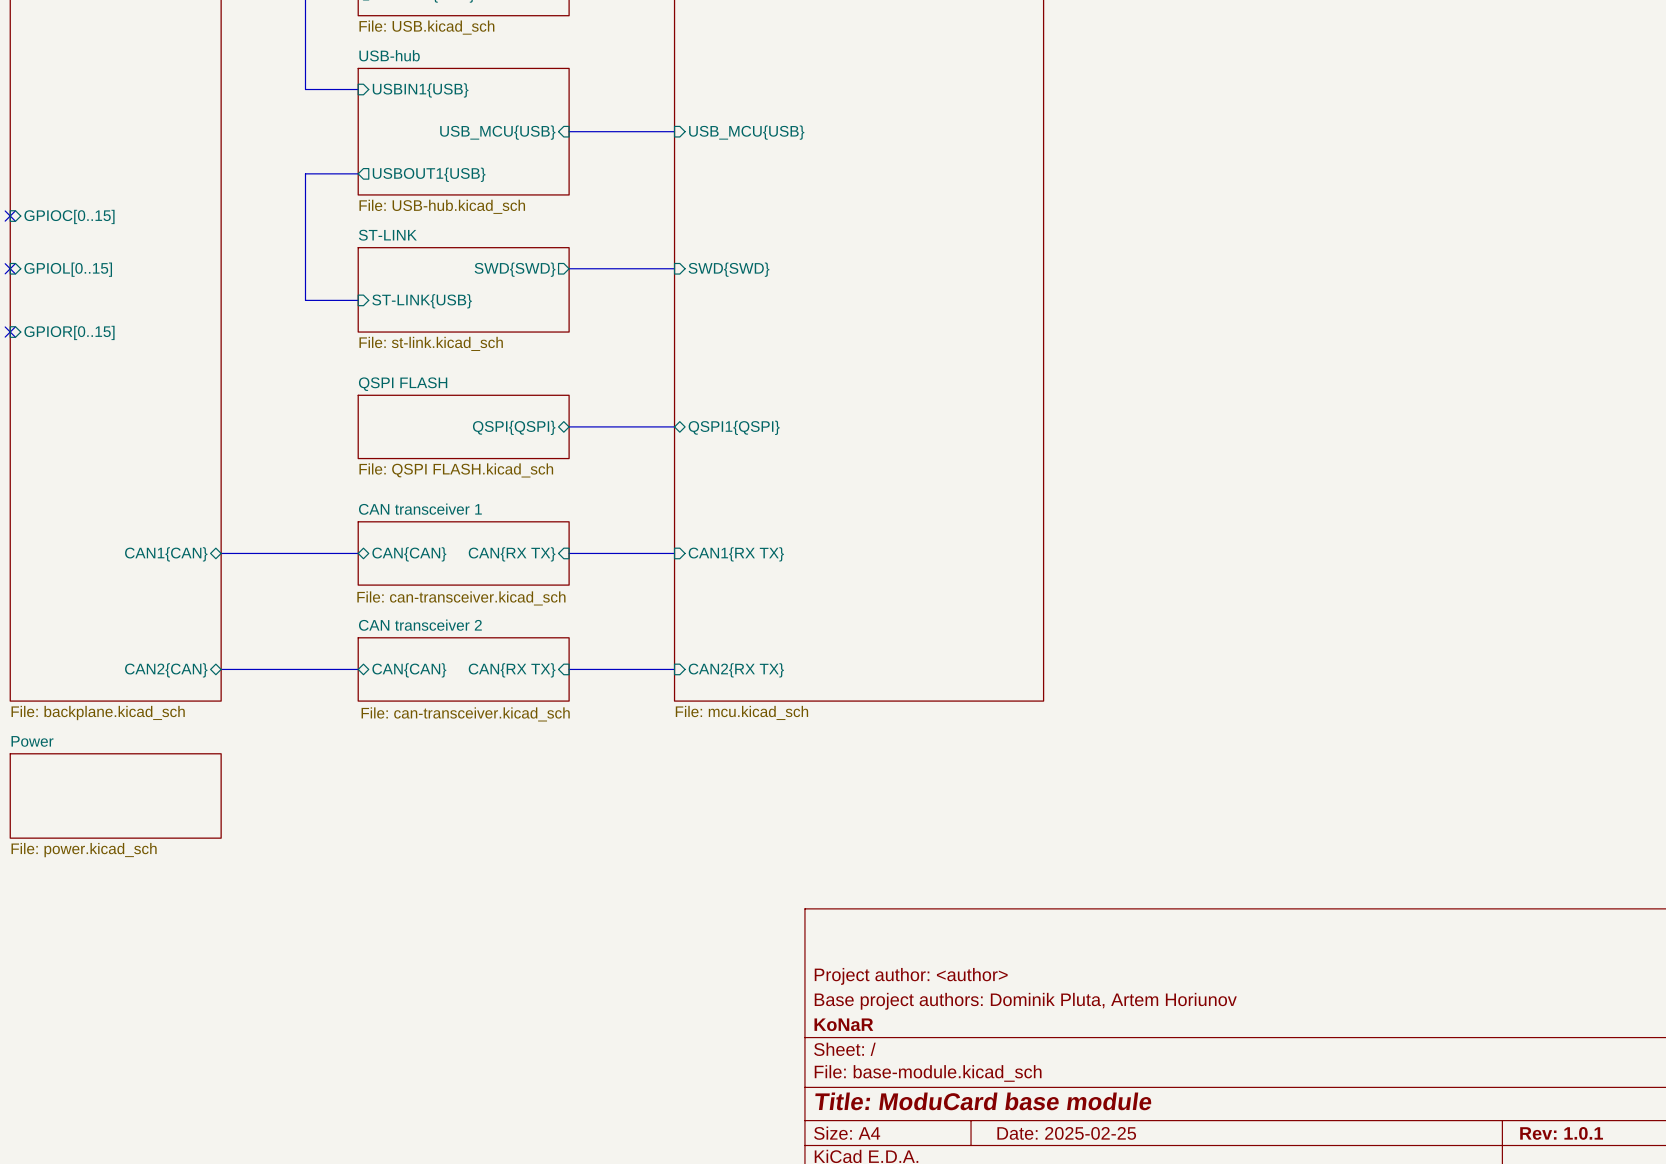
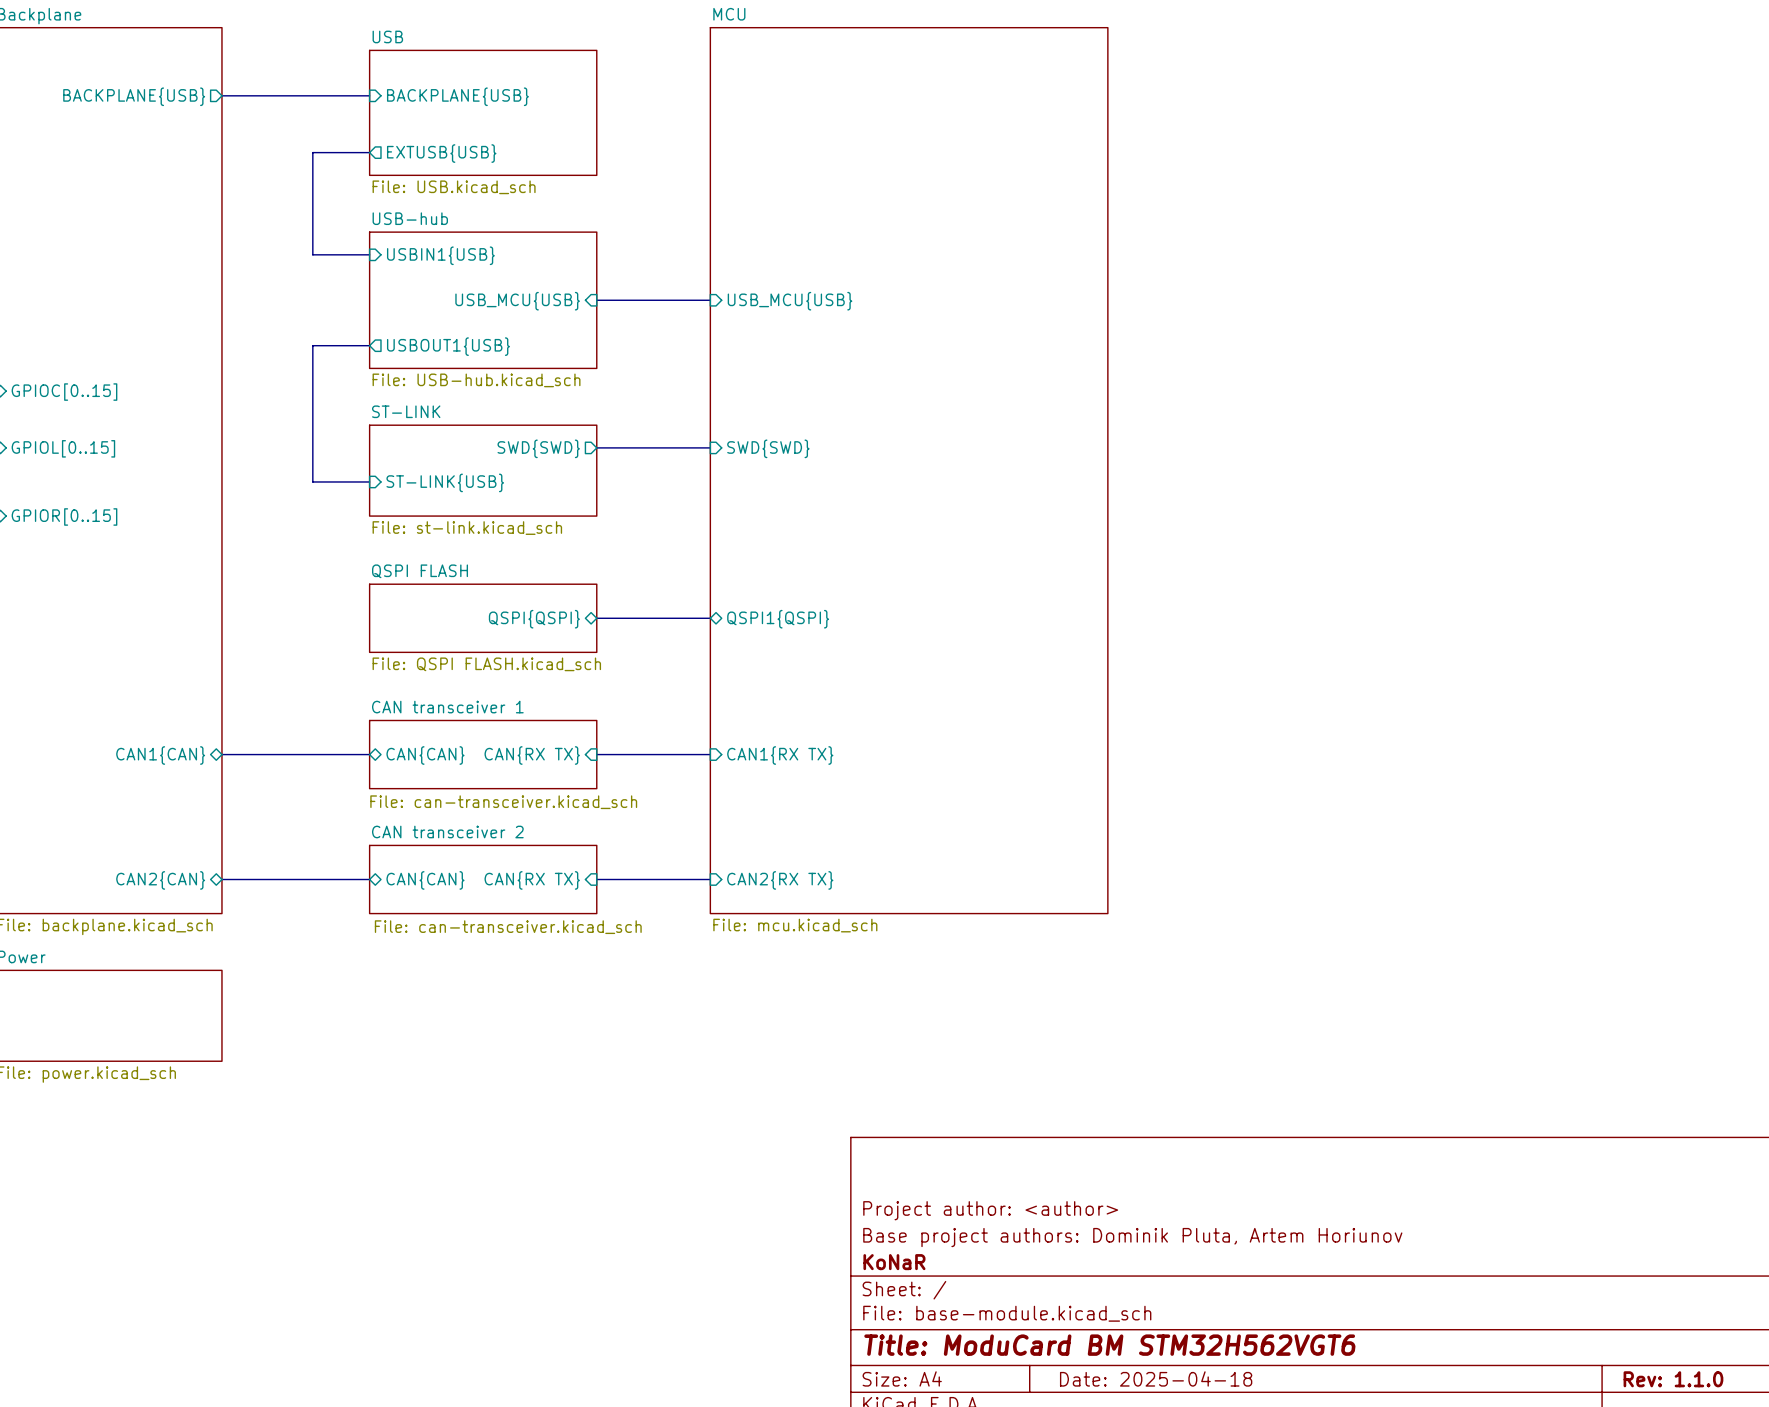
title block: Title: ModuCard base module (983, 1101) -> Title: ModuCard BM STM32H562VGT6 (1109, 1345)
title block: Date: 2025-02-25 (1066, 1133) -> Date: 2025-04-18 (1156, 1378)
title block: Rev: 1.0.1 (1561, 1133) -> Rev: 1.1.0 (1673, 1379)

